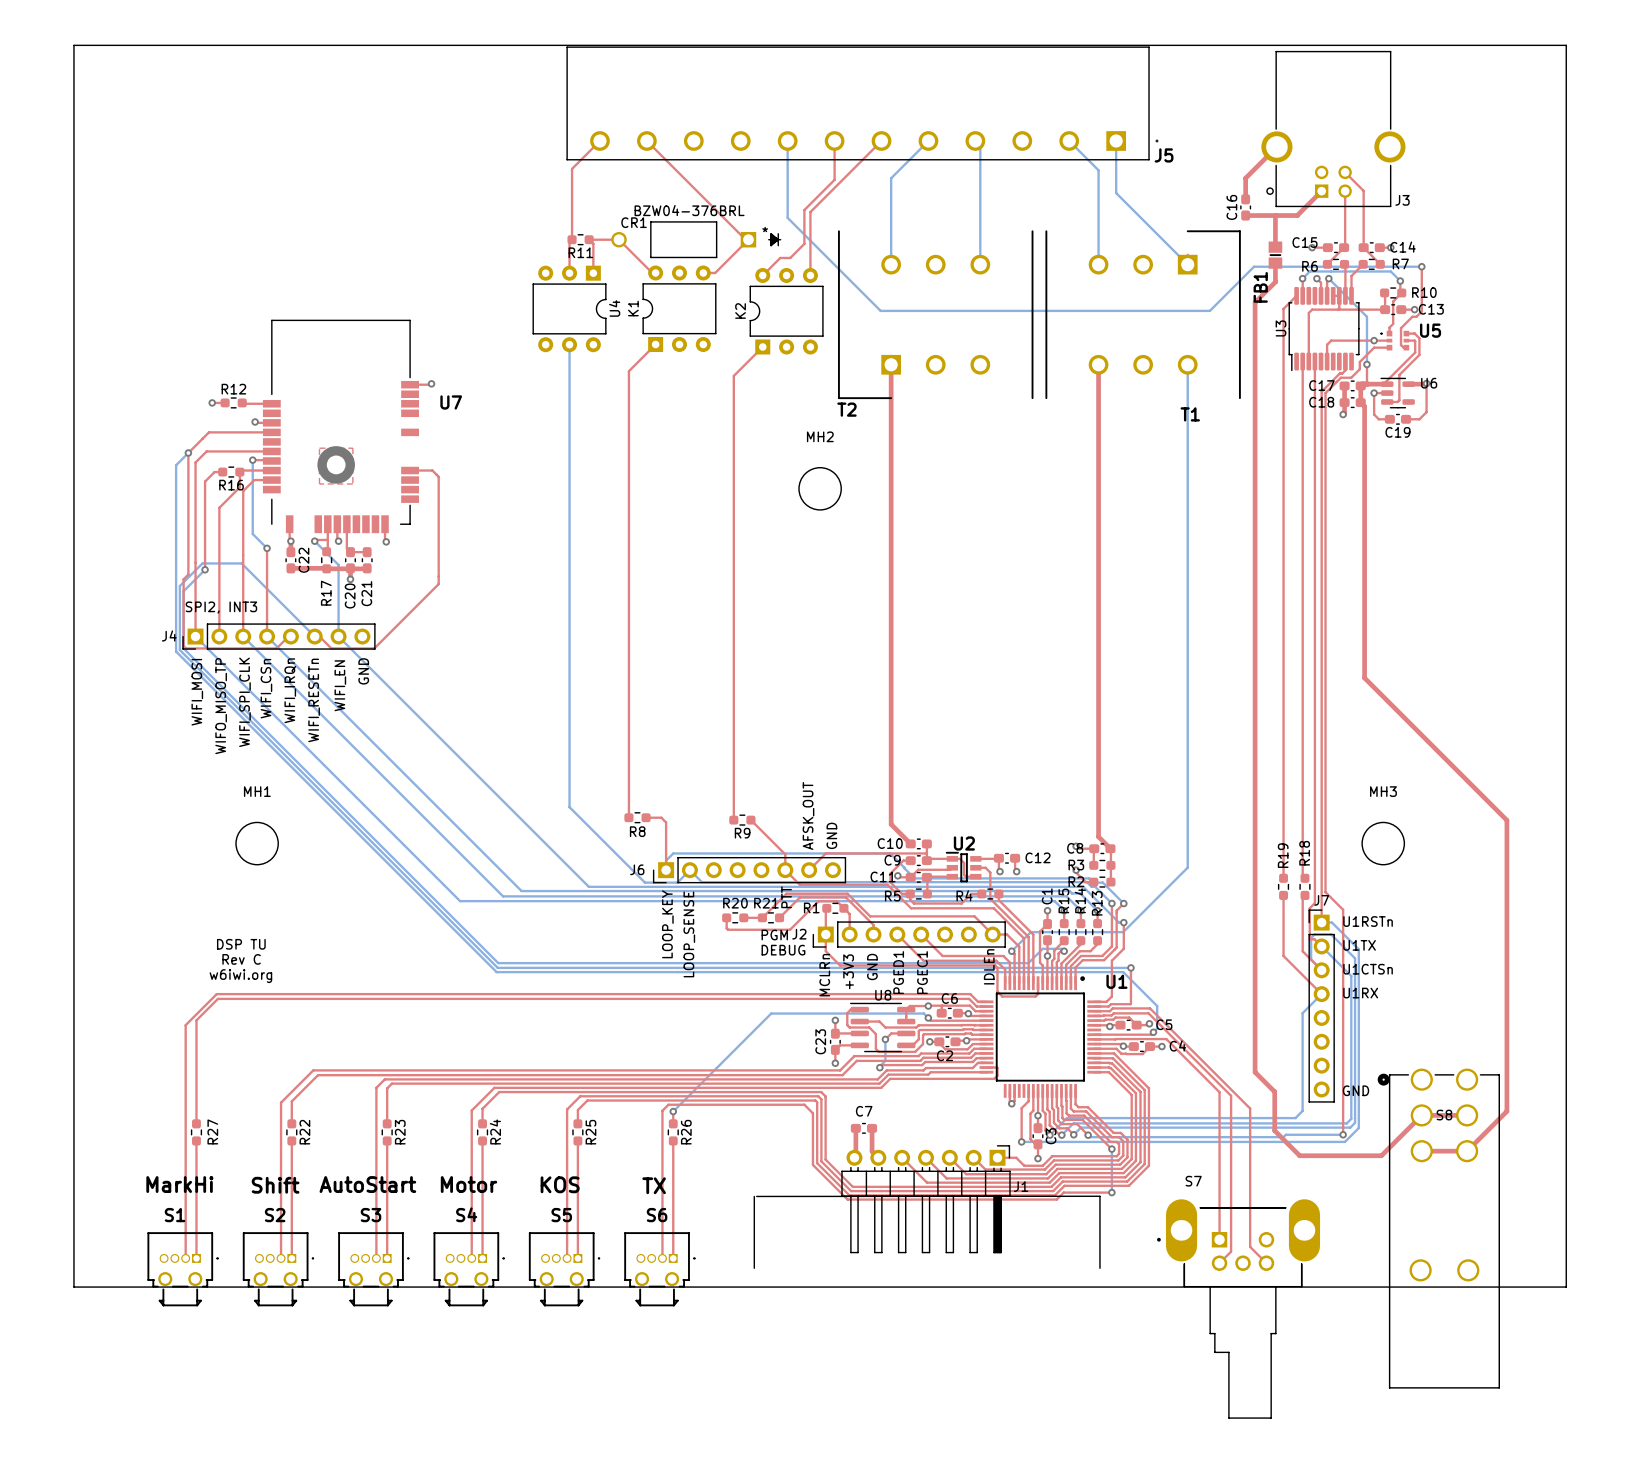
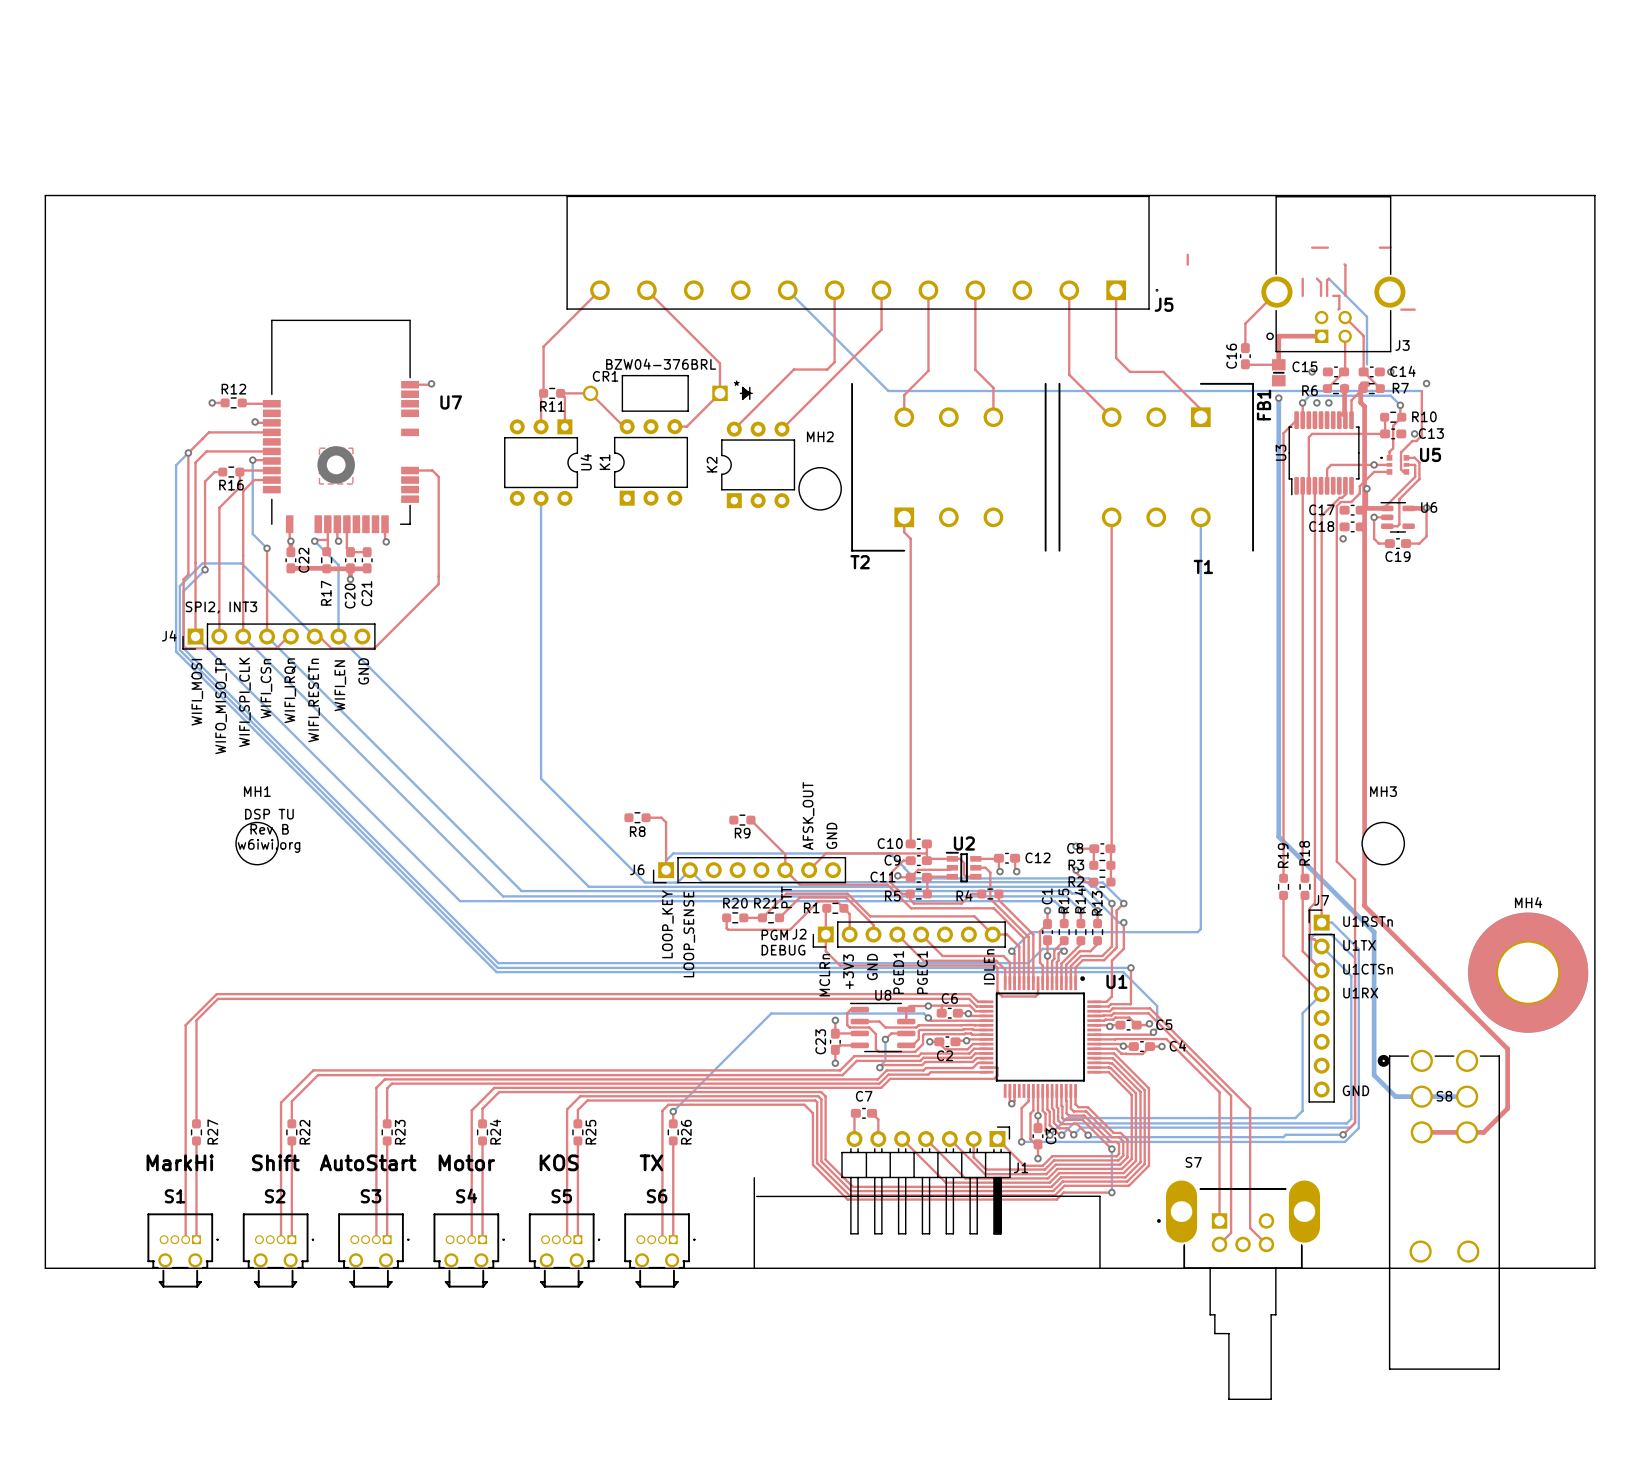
board edge: (73, 45) (1566, 45) (1566, 1287) (73, 1287) (73, 45) -> (45, 195) (45, 1268) (1594, 1268) (1594, 195) (45, 195)
J5 position: (862, 103) -> (862, 252)
J3 position: (1333, 129) -> (1333, 274)
top track: (599, 140) (572, 168) (572, 239) (569, 242) (569, 273) -> none
top track: (646, 140) (745, 239) (748, 239) (715, 272) (703, 272) -> none
bottom track: (787, 140) (787, 217) (880, 310) (1209, 310) (1254, 266) (1421, 266) -> none
top track: (834, 140) (834, 179) (804, 210) (804, 243) (790, 257) (780, 257) (762, 275) -> none
top track: (881, 140) (810, 212) (810, 275) -> none
bottom track: (928, 140) (891, 178) (891, 264) -> none
bottom track: (975, 140) (980, 145) (980, 264) -> none
bottom track: (1069, 140) (1098, 170) (1098, 264) -> none
bottom track: (1116, 140) (1116, 193) (1187, 264) -> none
top track: (1276, 146) (1245, 178) (1245, 199) -> none
top track: (1345, 172) (1363, 190) (1363, 247) (1380, 264) -> none
top track: (1321, 191) (1297, 215) (1246, 216) -> none
top track: (1345, 191) (1345, 246) (1327, 264) -> none
C16 position: (1245, 207) -> (1245, 356)
top track: (1275, 215) (1275, 247) -> none
R11 position: (580, 239) -> (552, 393)
CR1 position: (696, 239) -> (667, 393)
via: (1312, 247) -> none
C15 position: (1335, 247) -> (1335, 371)
C14 position: (1371, 247) -> (1371, 371)
via: (1390, 247) -> none
FB1 position: (1275, 255) -> (1278, 372)
top track: (1275, 263) (1275, 281) (1255, 302) (1255, 1072) (1274, 1091) (1274, 1130) (1299, 1155) (1381, 1155) (1421, 1115) (1467, 1115) -> none
R6 position: (1335, 264) -> (1335, 388)
top track: (1363, 264) (1351, 276) (1351, 295) -> (1363, 388) (1351, 400) (1351, 420)
R7 position: (1371, 264) -> (1371, 388)
top track: (1421, 266) (1421, 311) (1416, 316) (1412, 316) (1401, 328) (1401, 345) (1406, 347) -> (1421, 391) (1421, 435) (1416, 441) (1412, 441) (1401, 452) (1401, 469) (1406, 471)
via: (1421, 266) -> none
top track: (655, 272) (652, 272) (619, 239) (589, 239) (593, 243) (593, 273) -> (627, 426) (623, 426) (590, 393) (560, 393) (564, 397) (564, 426)
bottom track: (1302, 278) (1309, 271) (1390, 271) (1400, 281) -> (1302, 402) (1309, 395) (1390, 395) (1400, 405)
via: (1302, 278) -> none
via: (1316, 278) -> none
via: (1328, 278) -> none
top track: (1400, 281) (1401, 292) (1393, 301) (1393, 323) (1389, 327) (1389, 333) -> (1400, 405) (1401, 417) (1393, 425) (1393, 448) (1389, 451) (1389, 457)
via: (1400, 281) -> none
top track: none -> (599, 290) (543, 346) (541, 426)
top track: none -> (646, 290) (719, 363) (719, 393) (686, 426) (674, 426)
bottom track: none -> (787, 290) (888, 391) (1421, 391)
top track: none -> (834, 290) (834, 362) (827, 369) (793, 369) (734, 429)
top track: none -> (881, 290) (881, 329) (781, 429)
top track: none -> (928, 290) (928, 370) (904, 395) (904, 417)
top track: none -> (975, 290) (975, 369) (993, 387) (993, 417)
top track: none -> (1069, 290) (1069, 374) (1111, 417)
top track: none -> (1116, 290) (1116, 358) (1130, 371) (1163, 371) (1200, 409)
top track: none -> (1276, 292) (1245, 323) (1245, 348)
top track: (1384, 292) (1385, 309) (1312, 309) (1308, 312) (1308, 361) -> (1384, 417) (1385, 433) (1312, 433) (1308, 437) (1308, 485)
R10 position: (1393, 292) -> (1393, 417)
top track: (1296, 295) (1283, 308) (1283, 433) -> (1296, 420) (1283, 433)
U4 position: (569, 308) -> (541, 462)
K1 position: (679, 308) -> (651, 462)
C13 position: (1393, 309) -> (1393, 433)
via: (1414, 309) -> none
K2 position: (786, 311) -> (758, 464)
T2 position: (935, 314) -> (948, 467)
T1 position: (1143, 314) -> (1156, 467)
top track: none -> (1345, 317) (1363, 335) (1363, 371) (1380, 388)
U3 position: (1324, 328) -> (1324, 453)
top track: (1406, 333) (1414, 333) -> (1406, 457) (1414, 457)
top track: (1414, 333) (1419, 338) (1419, 354) (1399, 374) (1399, 400) (1387, 401) -> (1414, 457) (1419, 462) (1419, 479) (1399, 499) (1399, 524) (1387, 526)
top track: none -> (1321, 336) (1278, 336) (1278, 364) (1245, 364)
top track: none -> (1345, 336) (1345, 370) (1327, 388)
via: (1374, 340) -> none
top track: (1389, 340) (1331, 340) (1327, 344) (1327, 361) -> (1389, 464) (1331, 464) (1327, 469) (1327, 485)
U5 position: (1394, 340) -> (1394, 464)
top track: (1406, 340) (1415, 341) (1415, 352) (1383, 384) -> (1406, 464) (1415, 465) (1415, 476) (1383, 508)
bottom track: (569, 344) (569, 807) -> (541, 498) (541, 778) (569, 807)
top track: (655, 344) (628, 371) (628, 817) -> none
top track: (762, 346) (733, 375) (733, 820) -> none
top track: (1389, 347) (1374, 347) (1359, 361) (1359, 369) (1351, 377) (1340, 377) (1325, 393) (1325, 892) -> none
top track: (1302, 361) (1302, 403) -> none
top track: (1314, 361) (1314, 485) -> none
top track: (1345, 361) (1345, 370) (1321, 391) (1321, 515) -> (1345, 485) (1345, 494) (1321, 515)
top track: (891, 364) (891, 824) (910, 843) -> (904, 517) (904, 532) (910, 538) (910, 843)
top track: (1098, 364) (1098, 836) (1110, 848) -> none
bottom track: (1187, 364) (1187, 867) (1123, 932) -> (1200, 517) (1200, 929) (1197, 932) (1123, 932)
top track: (1366, 364) (1367, 384) (1386, 383) -> (1366, 488) (1367, 508) (1386, 507)
via: (1366, 364) -> none
via: none -> (1312, 371)
via: none -> (1390, 371)
top track: (1408, 384) (1426, 383) (1426, 412) (1419, 419) (1406, 419) -> (1408, 508) (1426, 507) (1426, 536) (1419, 543) (1406, 543)
C17 position: (1352, 385) -> (1352, 510)
via: (1374, 393) -> none
top track: (1387, 393) (1374, 393) (1374, 414) (1378, 419) (1389, 419) -> (1387, 517) (1374, 517) (1374, 538) (1378, 543) (1389, 543)
U6 position: (1397, 393) -> (1397, 517)
bottom track: none -> (1278, 398) (1278, 836) (1374, 932) (1374, 1075) (1395, 1096) (1467, 1096)
via: none -> (1278, 398)
via: none -> (1302, 402)
via: none -> (1316, 402)
via: none -> (1328, 402)
C18 position: (1352, 402) -> (1352, 526)
via: none -> (1400, 405)
via: (1343, 414) -> none
C19 position: (1397, 419) -> (1397, 543)
top track: (1302, 420) (1302, 485) -> none
via: none -> (1414, 433)
via: none -> (1374, 464)
via: none -> (1366, 488)
via: none -> (1426, 507)
top track: none -> (1111, 517) (1111, 847)
via: none -> (1374, 517)
via: none -> (1343, 538)
top track: (1364, 678) (1506, 820) (1506, 1111) (1467, 1151) (1421, 1151) -> (1364, 678) (1364, 905) (1507, 1048) (1507, 1108) (1483, 1132) (1421, 1132)
text: none -> Rev B (269, 829)
top track: (1325, 892) (1343, 909) (1343, 1134) -> (1389, 471) (1374, 471) (1359, 486) (1359, 493) (1351, 502) (1340, 502) (1336, 506) (1336, 861) (1355, 879) (1355, 1122) (1343, 1134)
text position: DSP TU (241, 944) -> DSP TU (269, 814)
text: Rev C (241, 959) -> none
MH4: none -> (1528, 972)
text position: w6iwi.org (240, 976) -> w6iwi.org (268, 845)
top track: none -> (855, 1113) (854, 1139)
top track: none -> (872, 1113) (878, 1119) (878, 1139)
top track: (855, 1128) (854, 1157) -> none
C7 position: (863, 1128) -> (863, 1113)
top track: (872, 1128) (872, 1151) (878, 1157) -> none
top track: (902, 1157) (927, 1182) (945, 1182) -> (902, 1139) (945, 1182)
top track: (925, 1157) (946, 1178) (965, 1178) -> (925, 1139) (965, 1178)
top track: (949, 1157) (966, 1174) (985, 1174) -> (949, 1139) (985, 1174)
top track: (973, 1157) (985, 1169) -> (973, 1139) (973, 1157) (985, 1169)
top track: (997, 1157) (1016, 1157) -> (997, 1139) (1016, 1157)
line: none -> (754, 1177) (754, 1196)
text position: MarkHi (179, 1184) -> MarkHi (180, 1162)
text position: AutoStart (367, 1184) -> AutoStart (368, 1162)
text position: Motor (469, 1184) -> Motor (466, 1162)
text position: KOS (560, 1184) -> KOS (559, 1162)
text position: Shift (275, 1185) -> Shift (275, 1162)
text position: TX (654, 1185) -> TX (651, 1162)
J1 position: (925, 1199) -> (925, 1180)
top track: (1219, 1220) (1219, 1239) -> none
top track: (1250, 1228) (1250, 1246) (1266, 1263) -> (1250, 1228) (1266, 1244)
S8 position: (1438, 1228) -> (1438, 1209)
top track: (1231, 1232) (1231, 1251) (1219, 1263) -> (1231, 1232) (1219, 1244)
top track: (185, 1239) (185, 1258) -> none
top track: (196, 1239) (196, 1258) -> none
top track: (281, 1239) (281, 1258) -> none
top track: (291, 1239) (291, 1258) -> none
top track: (376, 1239) (376, 1258) -> none
top track: (387, 1239) (387, 1258) -> none
top track: (471, 1239) (471, 1258) -> none
top track: (482, 1239) (482, 1258) -> none
top track: (567, 1239) (567, 1258) -> none
top track: (577, 1239) (577, 1258) -> none
top track: (662, 1239) (662, 1258) -> none
top track: (673, 1239) (673, 1258) -> none
S1 position: (182, 1269) -> (182, 1250)
S2 position: (278, 1269) -> (278, 1250)
S3 position: (373, 1269) -> (373, 1250)
S4 position: (469, 1269) -> (469, 1250)
S5 position: (564, 1269) -> (564, 1250)
S6 position: (659, 1269) -> (659, 1250)
S7 position: (1238, 1308) -> (1238, 1290)

